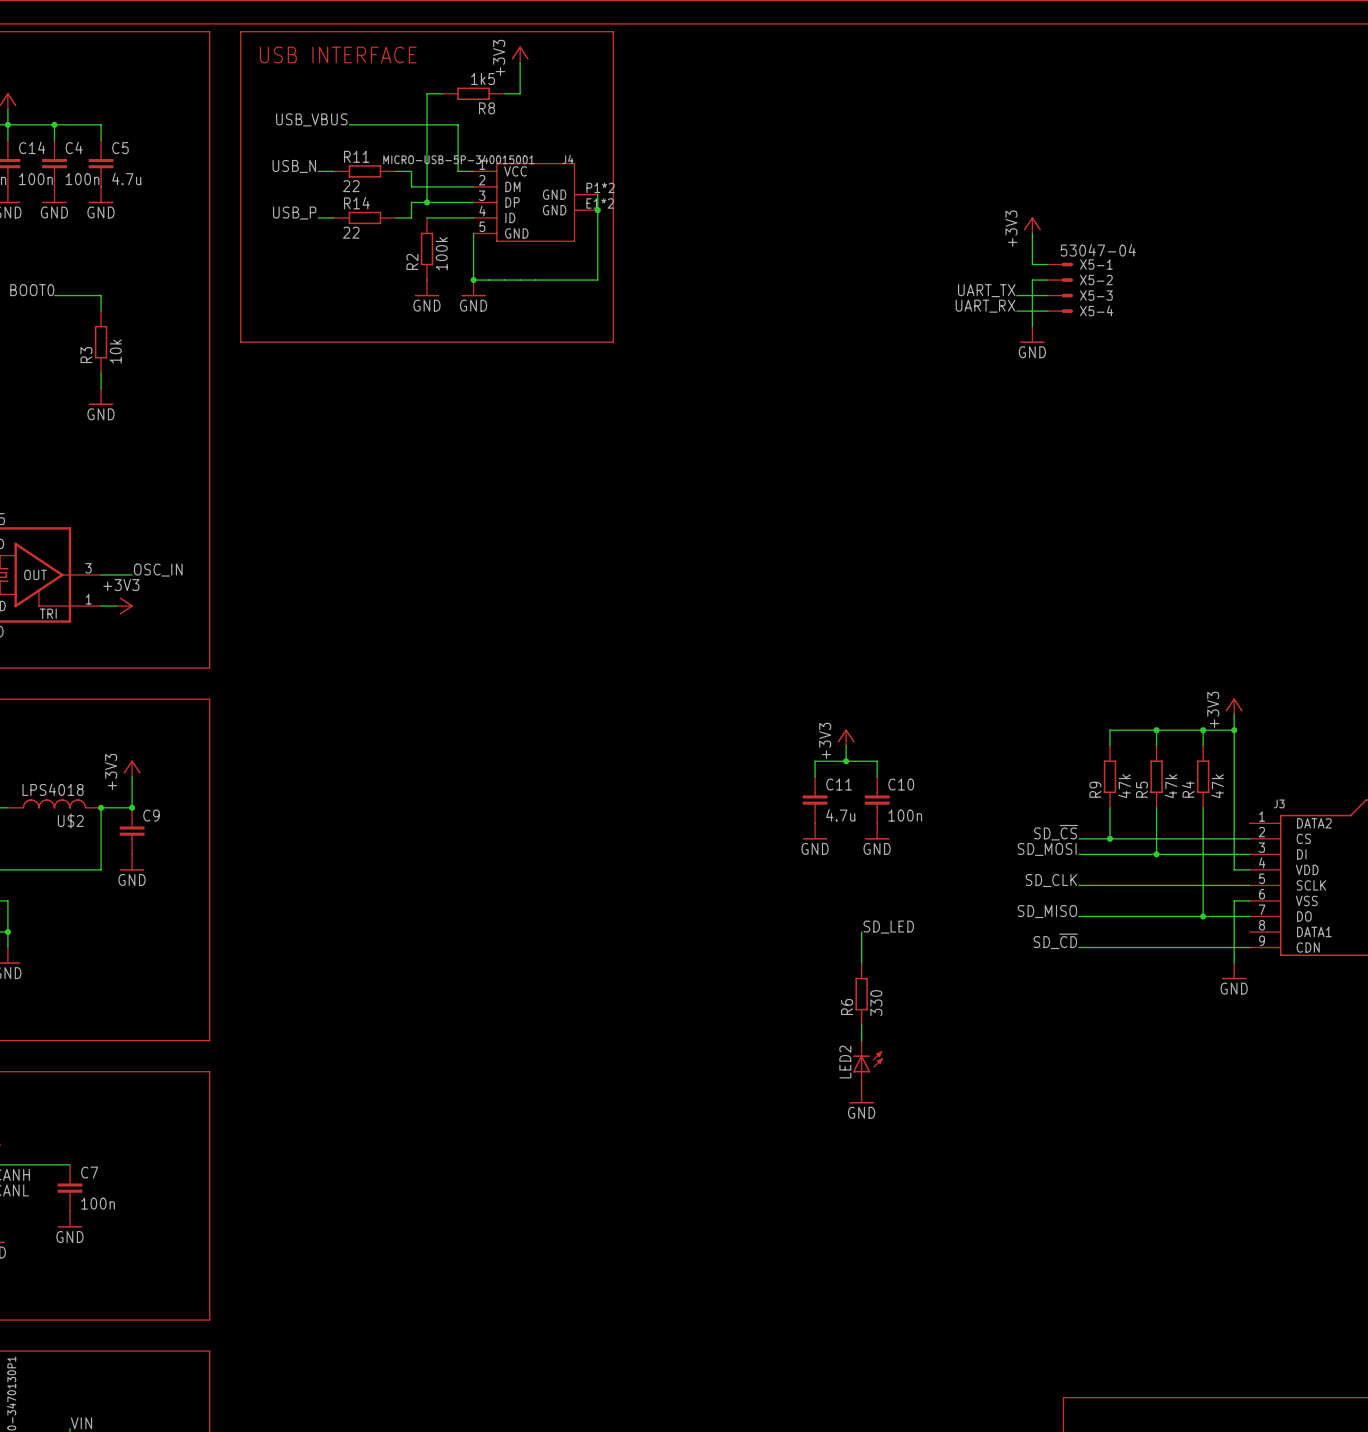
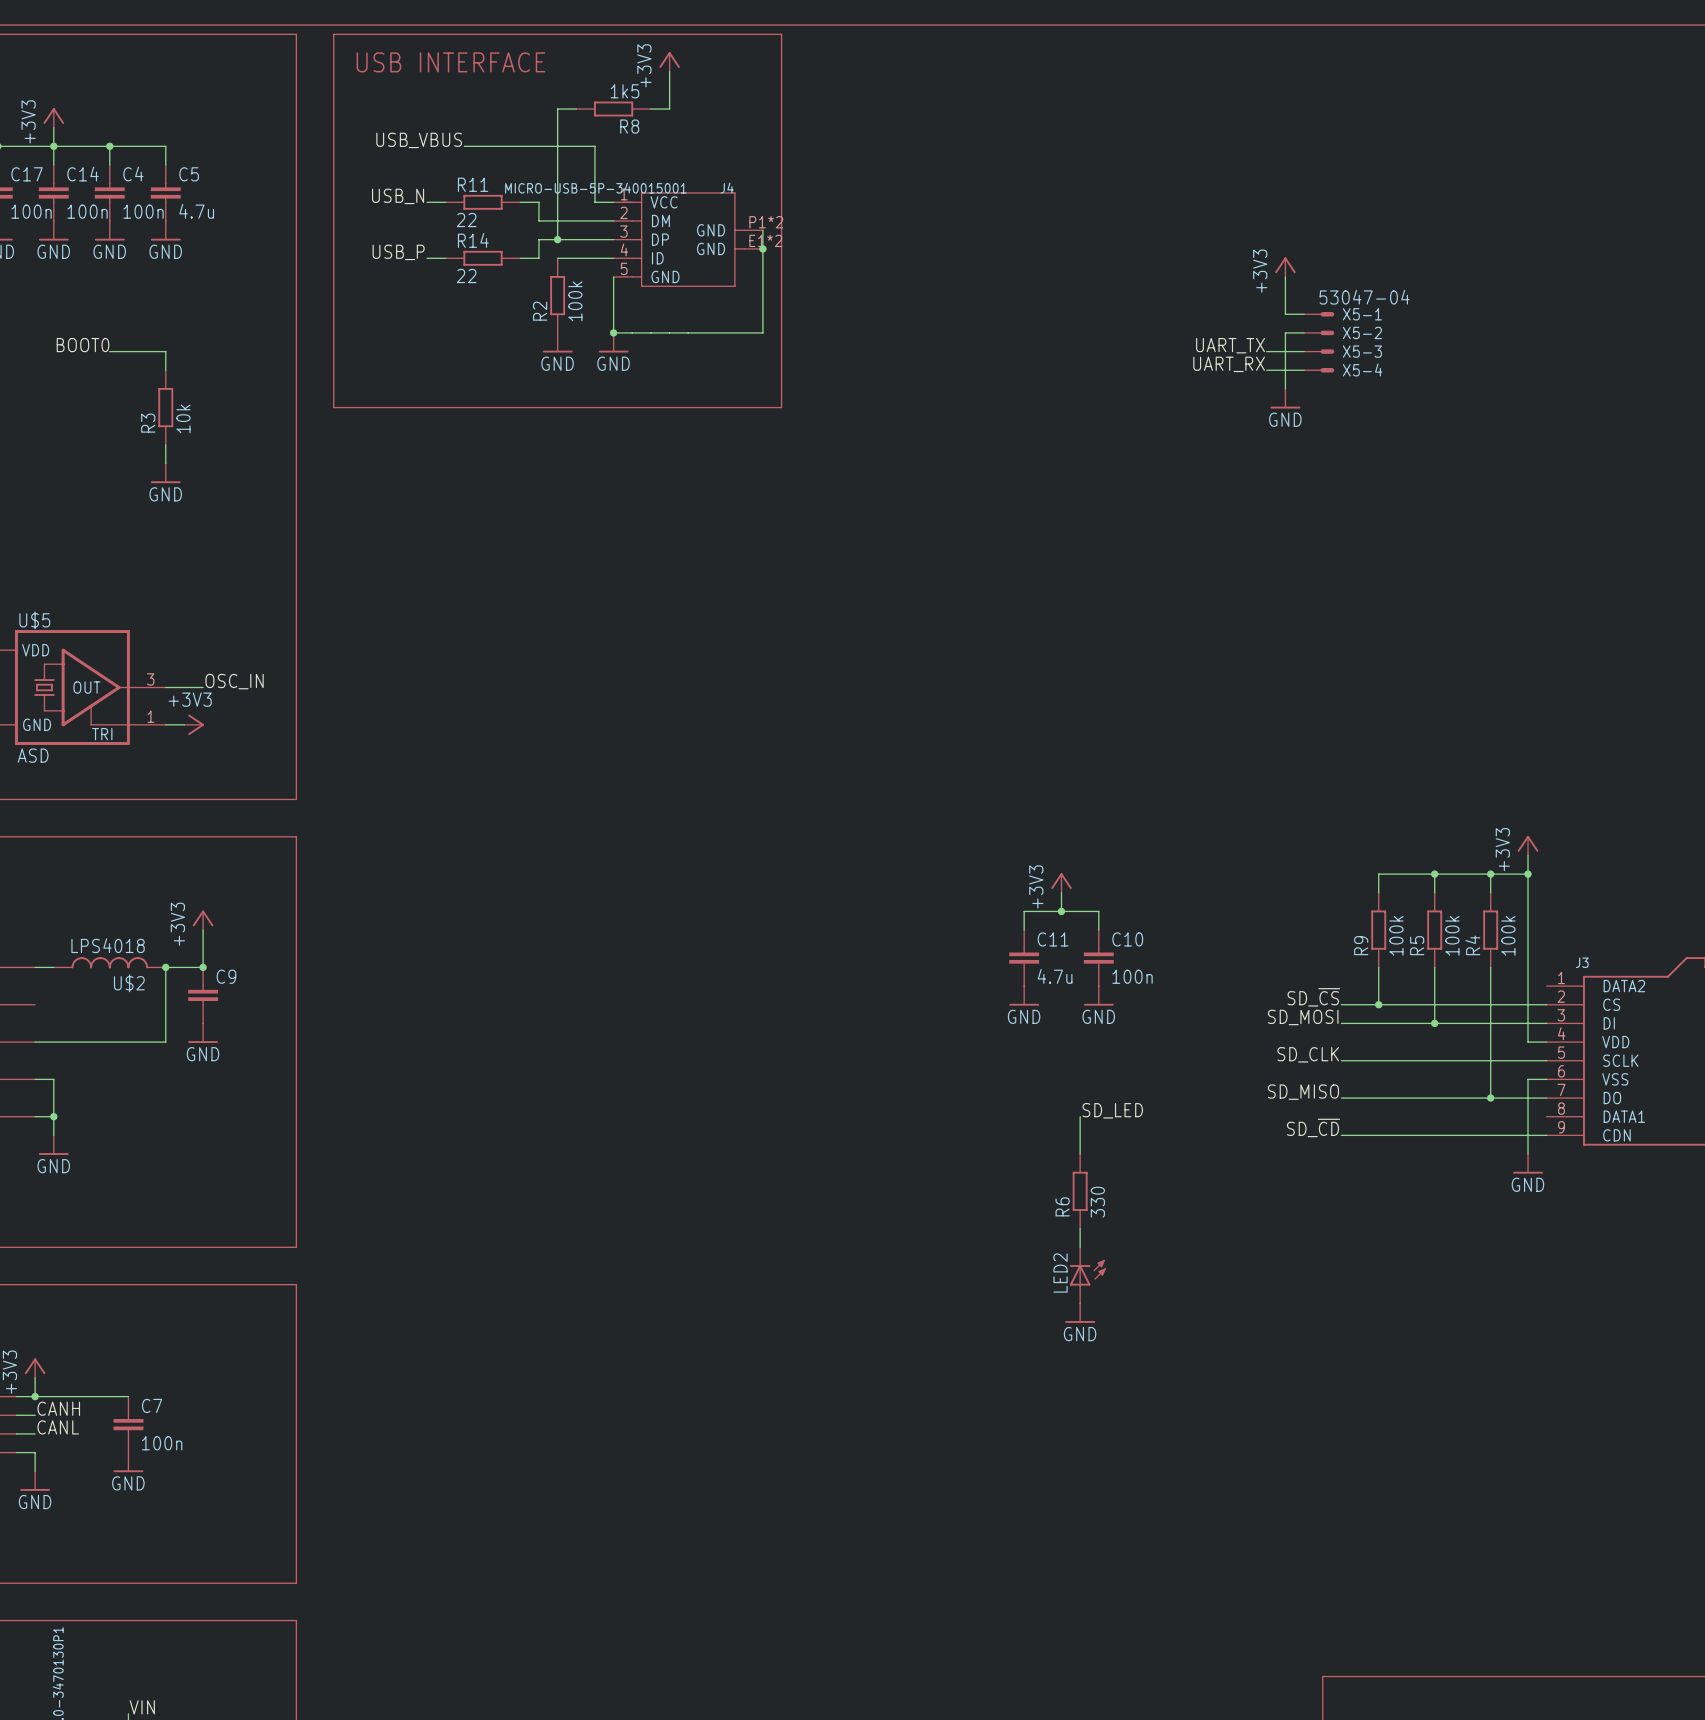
R9 value: 47k (1124, 786) -> 100k (1396, 935)
R5 value: 47k (1171, 786) -> 100k (1452, 935)
R4 value: 47k (1217, 786) -> 100k (1508, 935)

